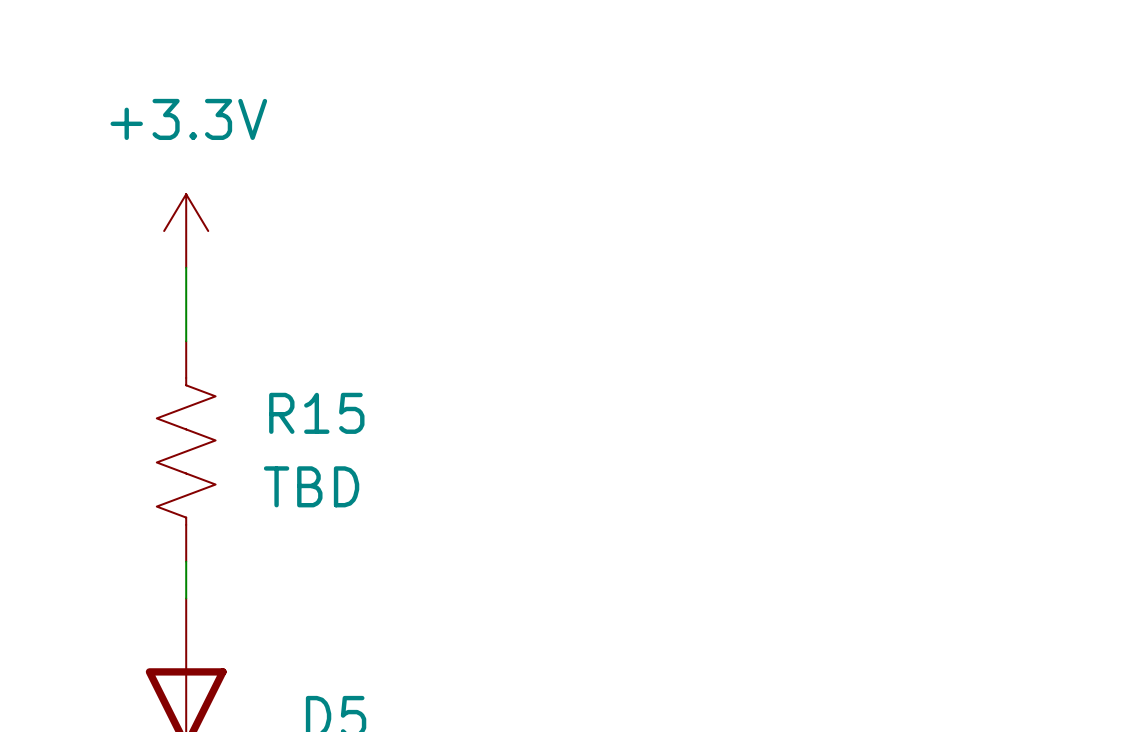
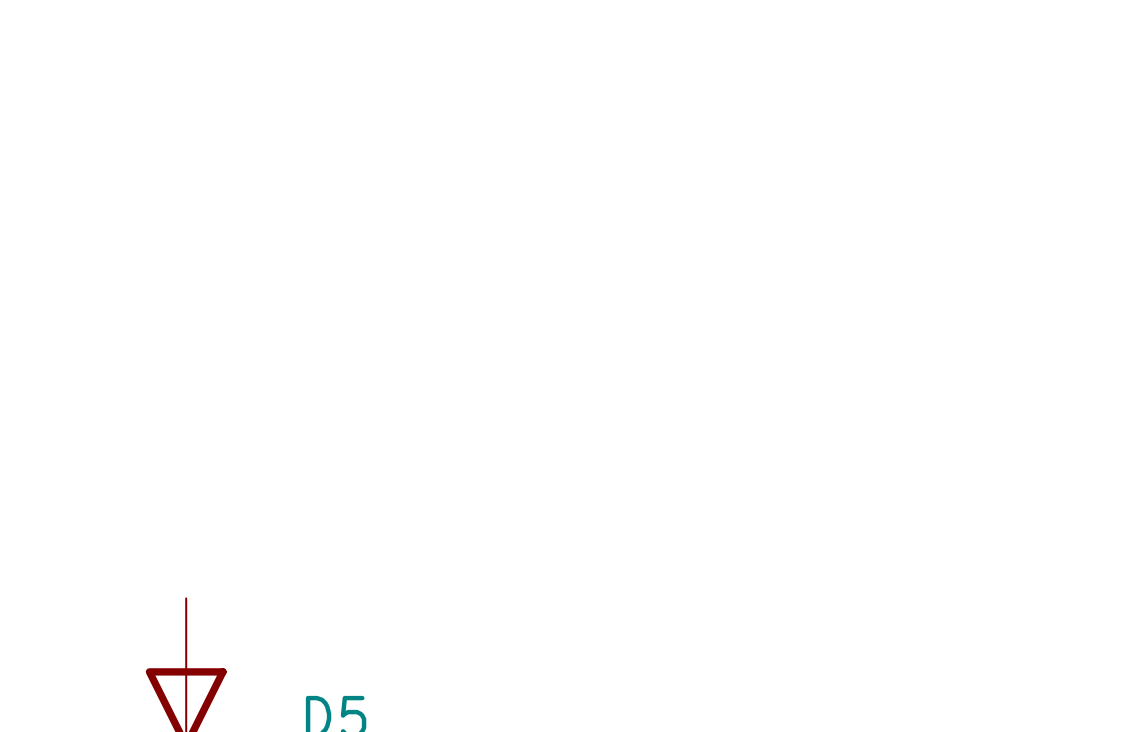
power symbol: +3.3V (186, 231) -> none
wire: (186, 267) (186, 341) -> none
R15: TBD (186, 451) -> none
wire: (186, 561) (186, 598) -> none

